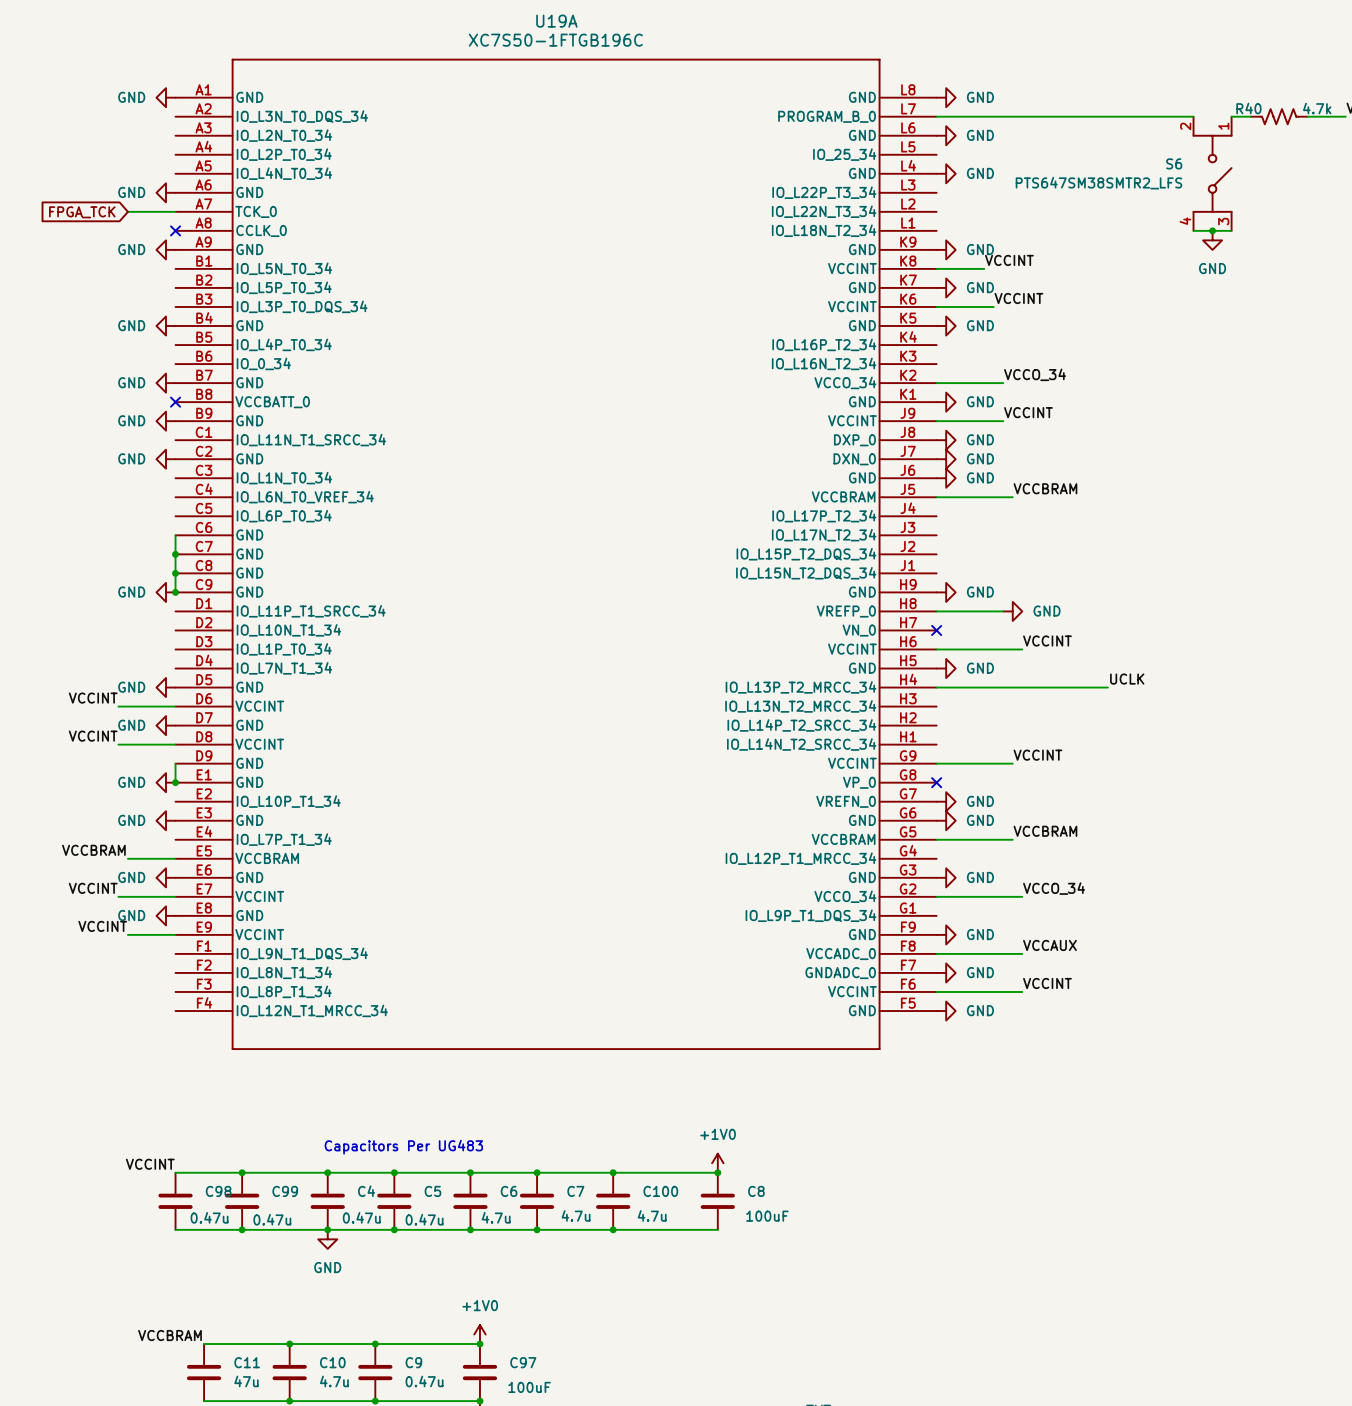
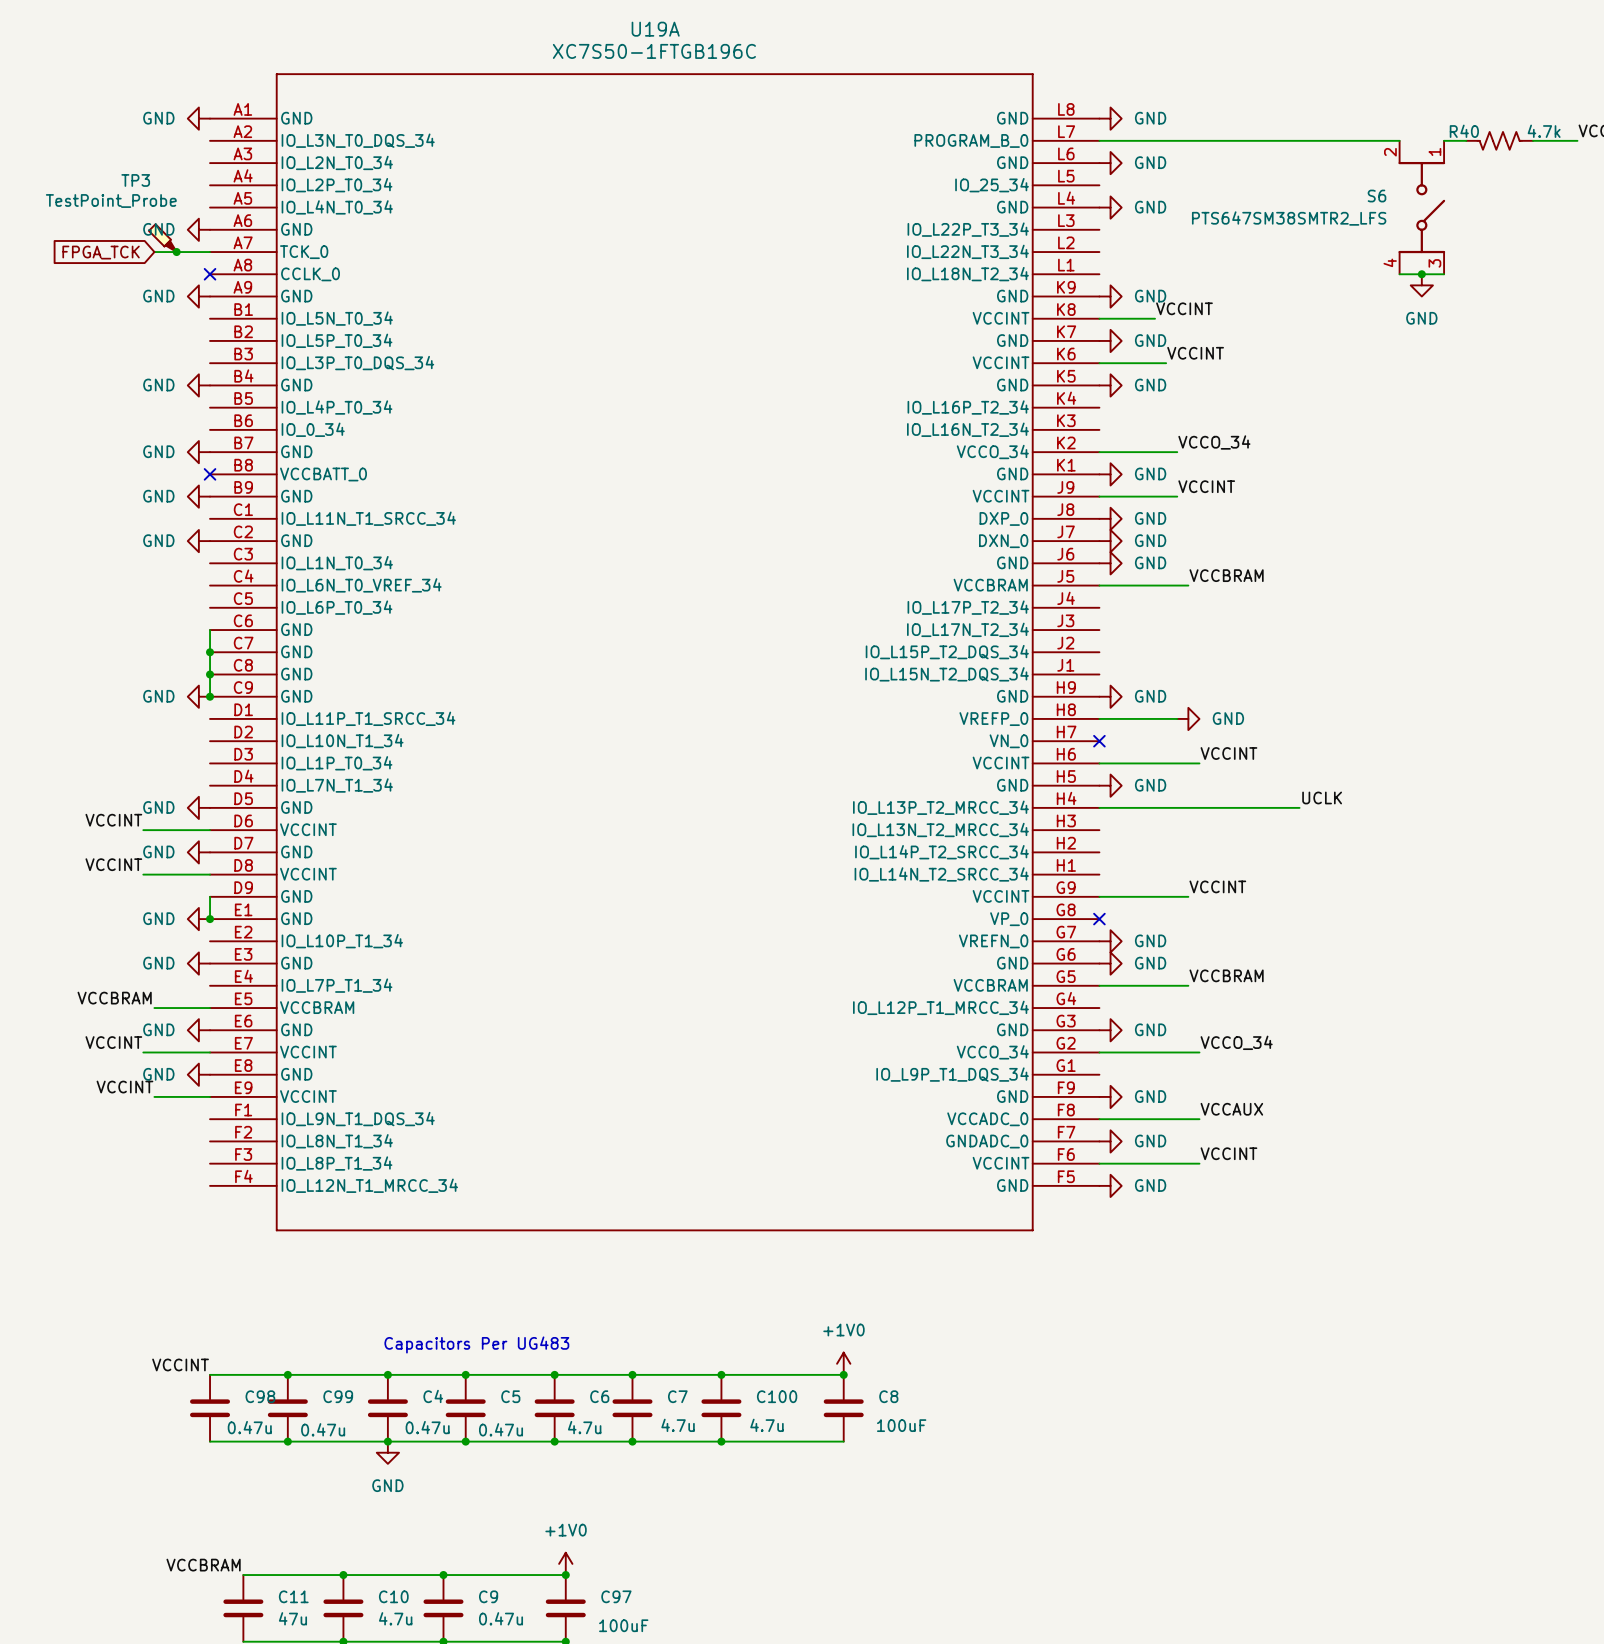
TP3: none -> TestPoint_Probe (162, 238)
junction: none -> (176, 252)

